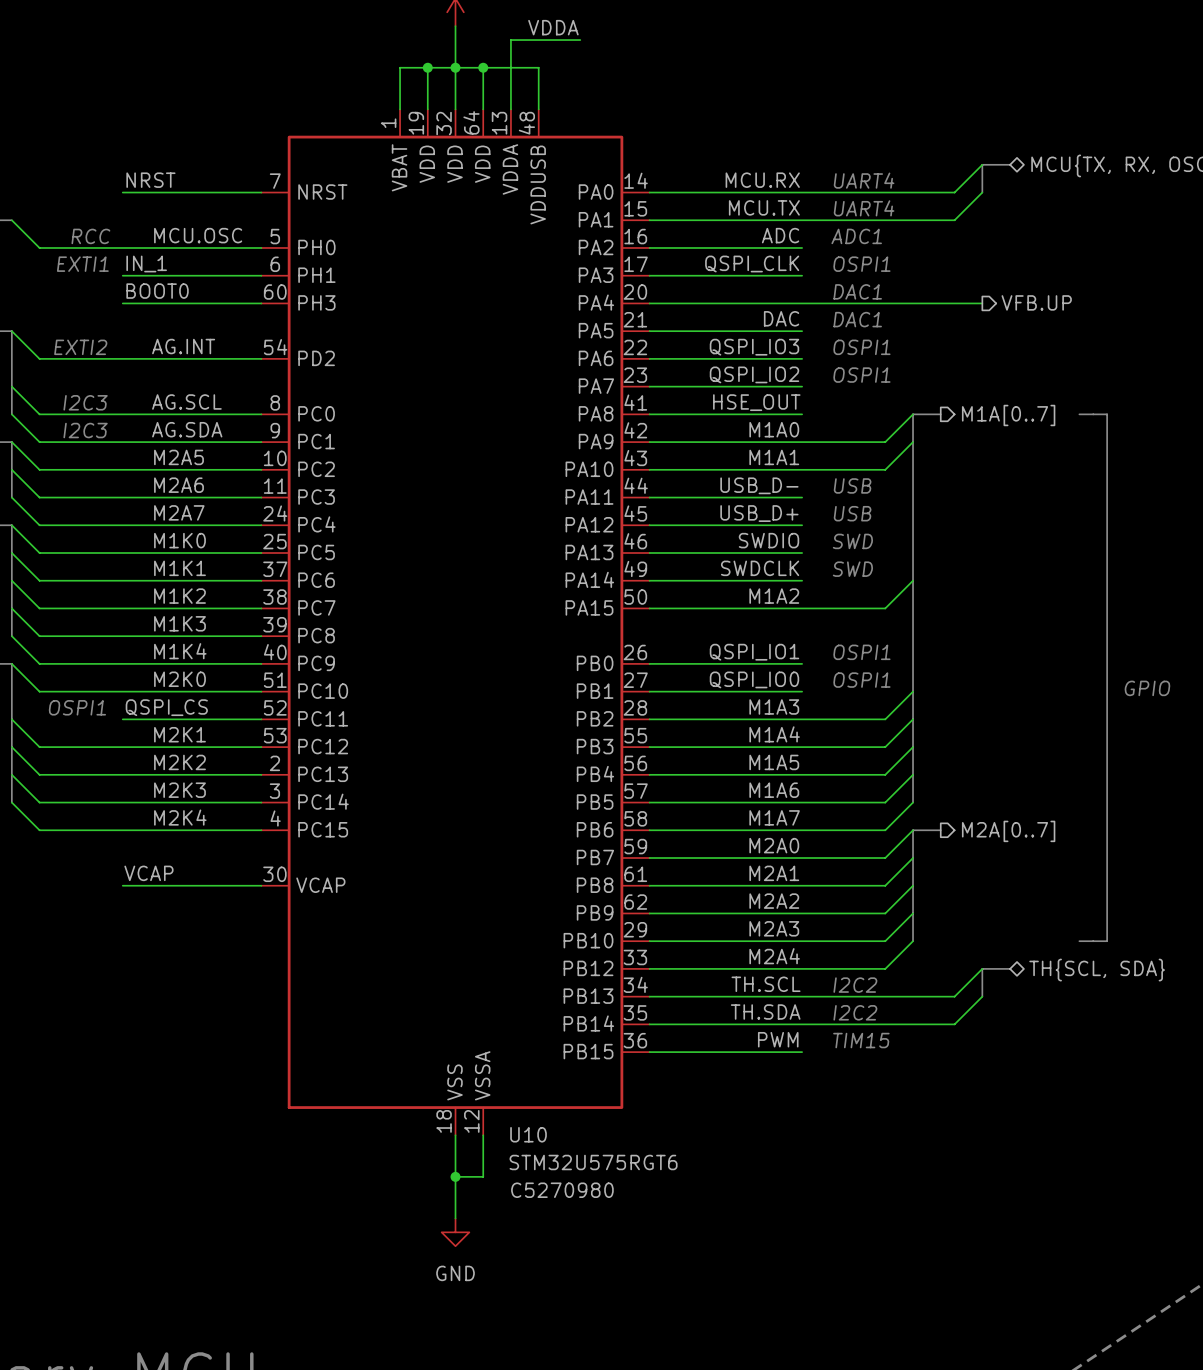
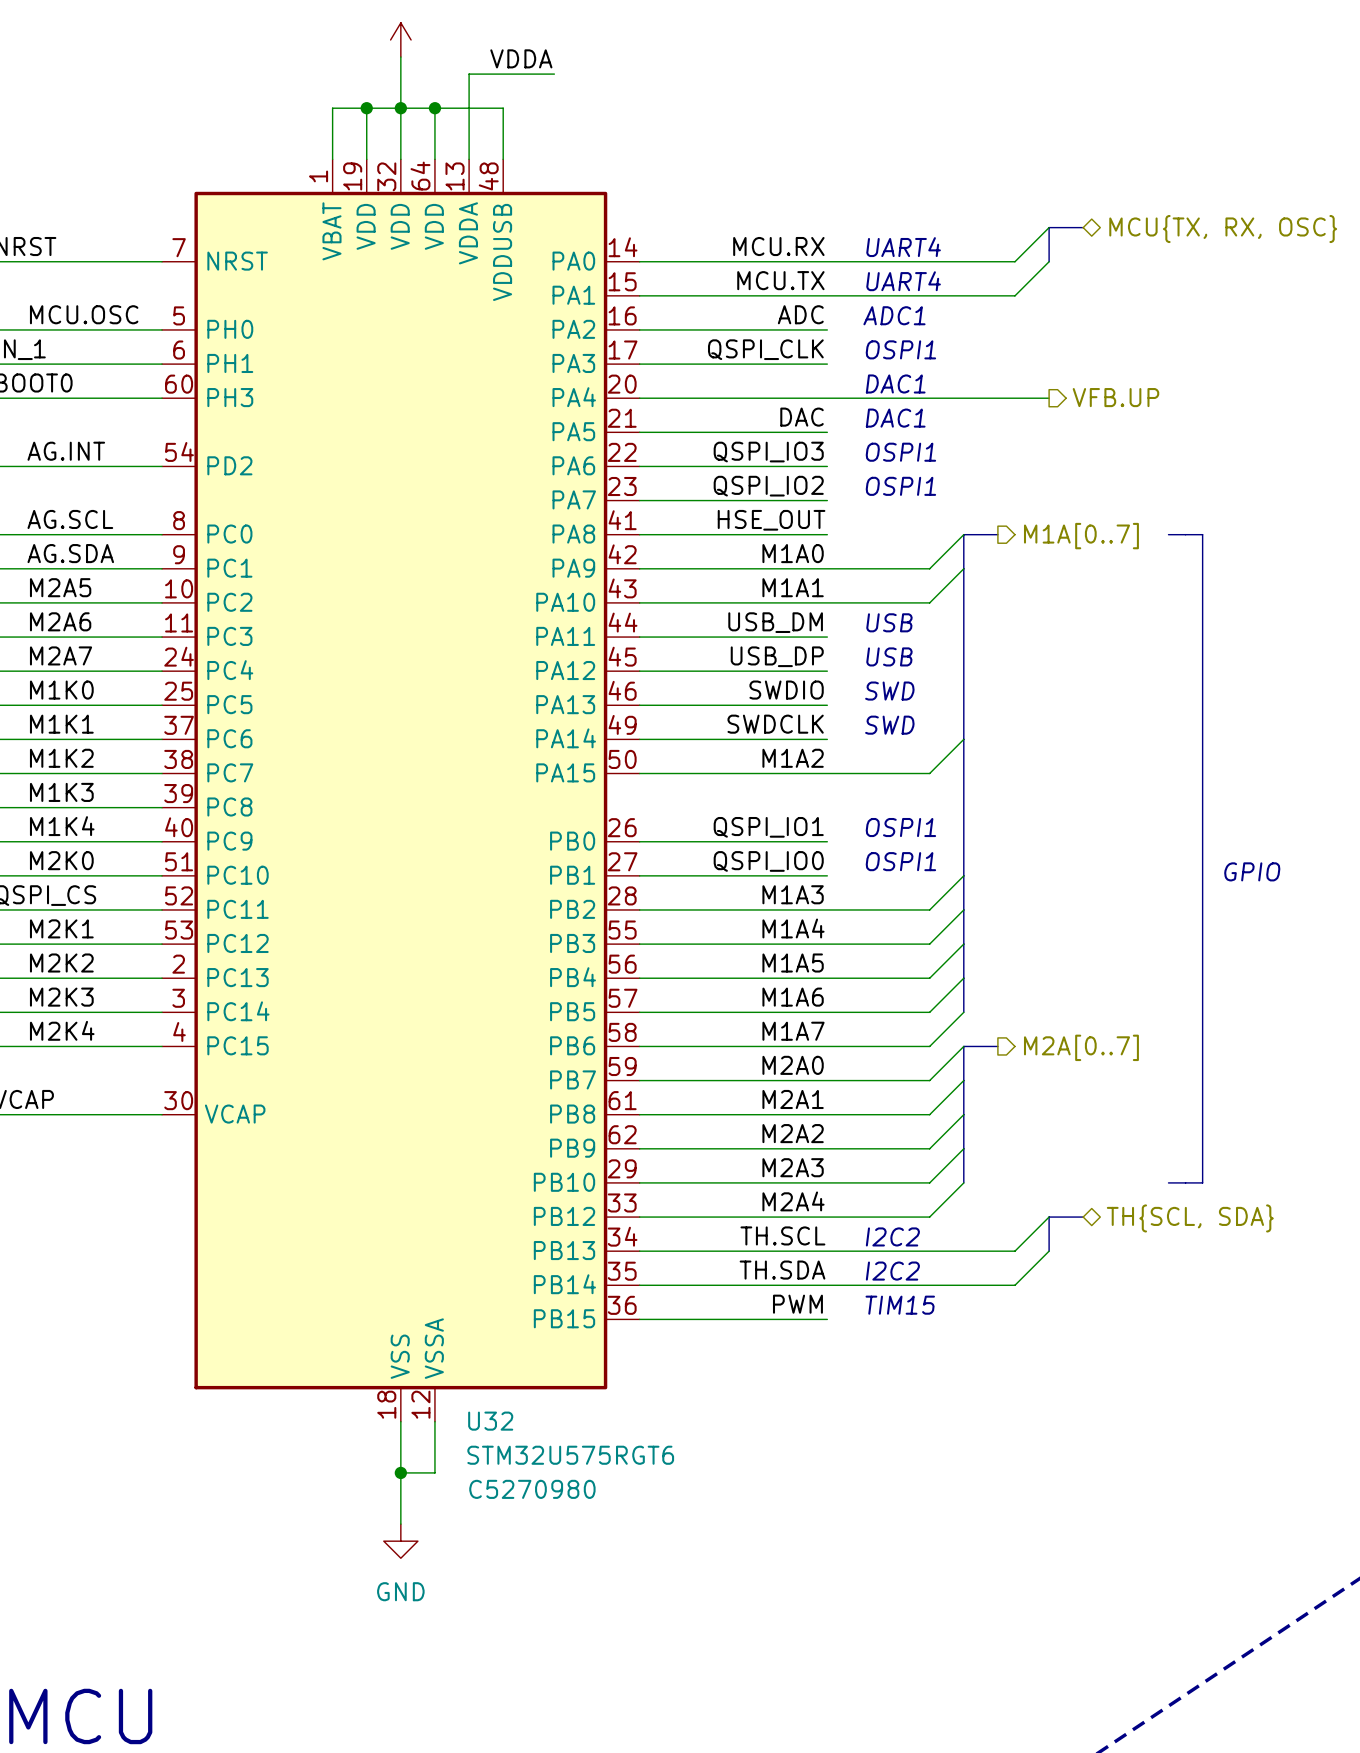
label: USB_D- (759, 485) -> USB_DM (775, 622)
label: USB_D+ (759, 513) -> USB_DP (777, 656)
U10 name: U10 (528, 1134) -> U32 (490, 1421)

